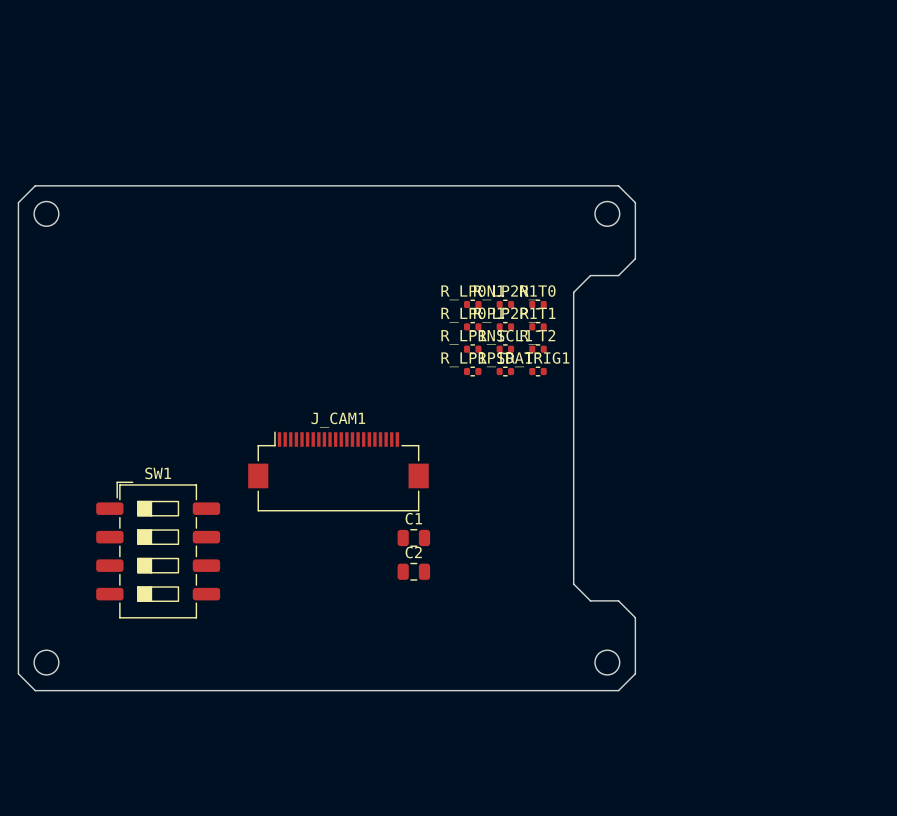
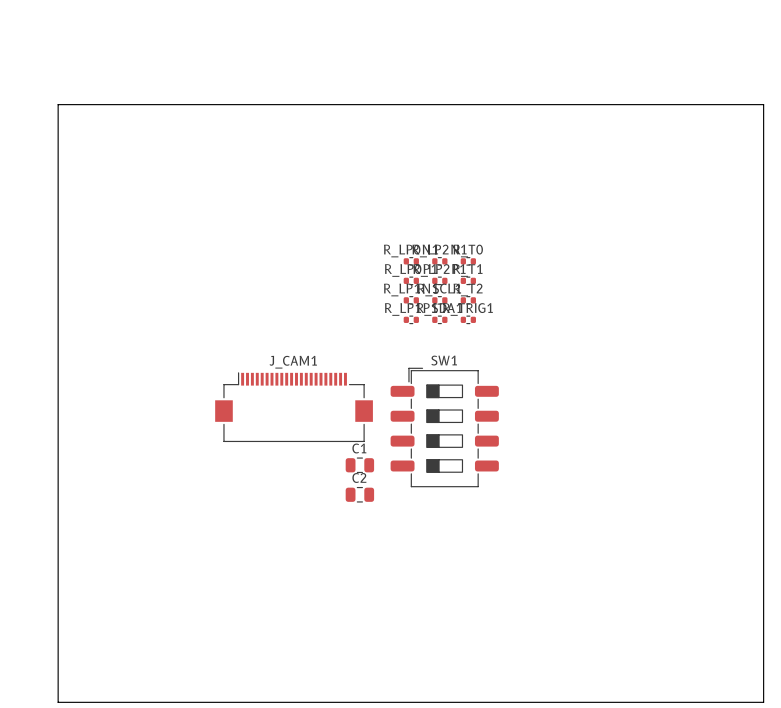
board edge: none -> (58, 104) (763, 104) (763, 702) (58, 702) (58, 104)
board edge: (35, 185) (18, 202) (18, 673) (35, 690) (618, 690) (635, 673) (635, 617) (618, 600) (590, 600) (573, 584) (573, 292) (590, 275) (618, 275) (635, 258) (635, 202) (618, 185) (35, 185) -> none
round board edge: [33, 200, 60, 227] -> none
round board edge: [594, 200, 621, 227] -> none
SW1 position: (158, 550) -> (444, 427)
round board edge: [33, 649, 60, 676] -> none
round board edge: [594, 649, 621, 676] -> none

